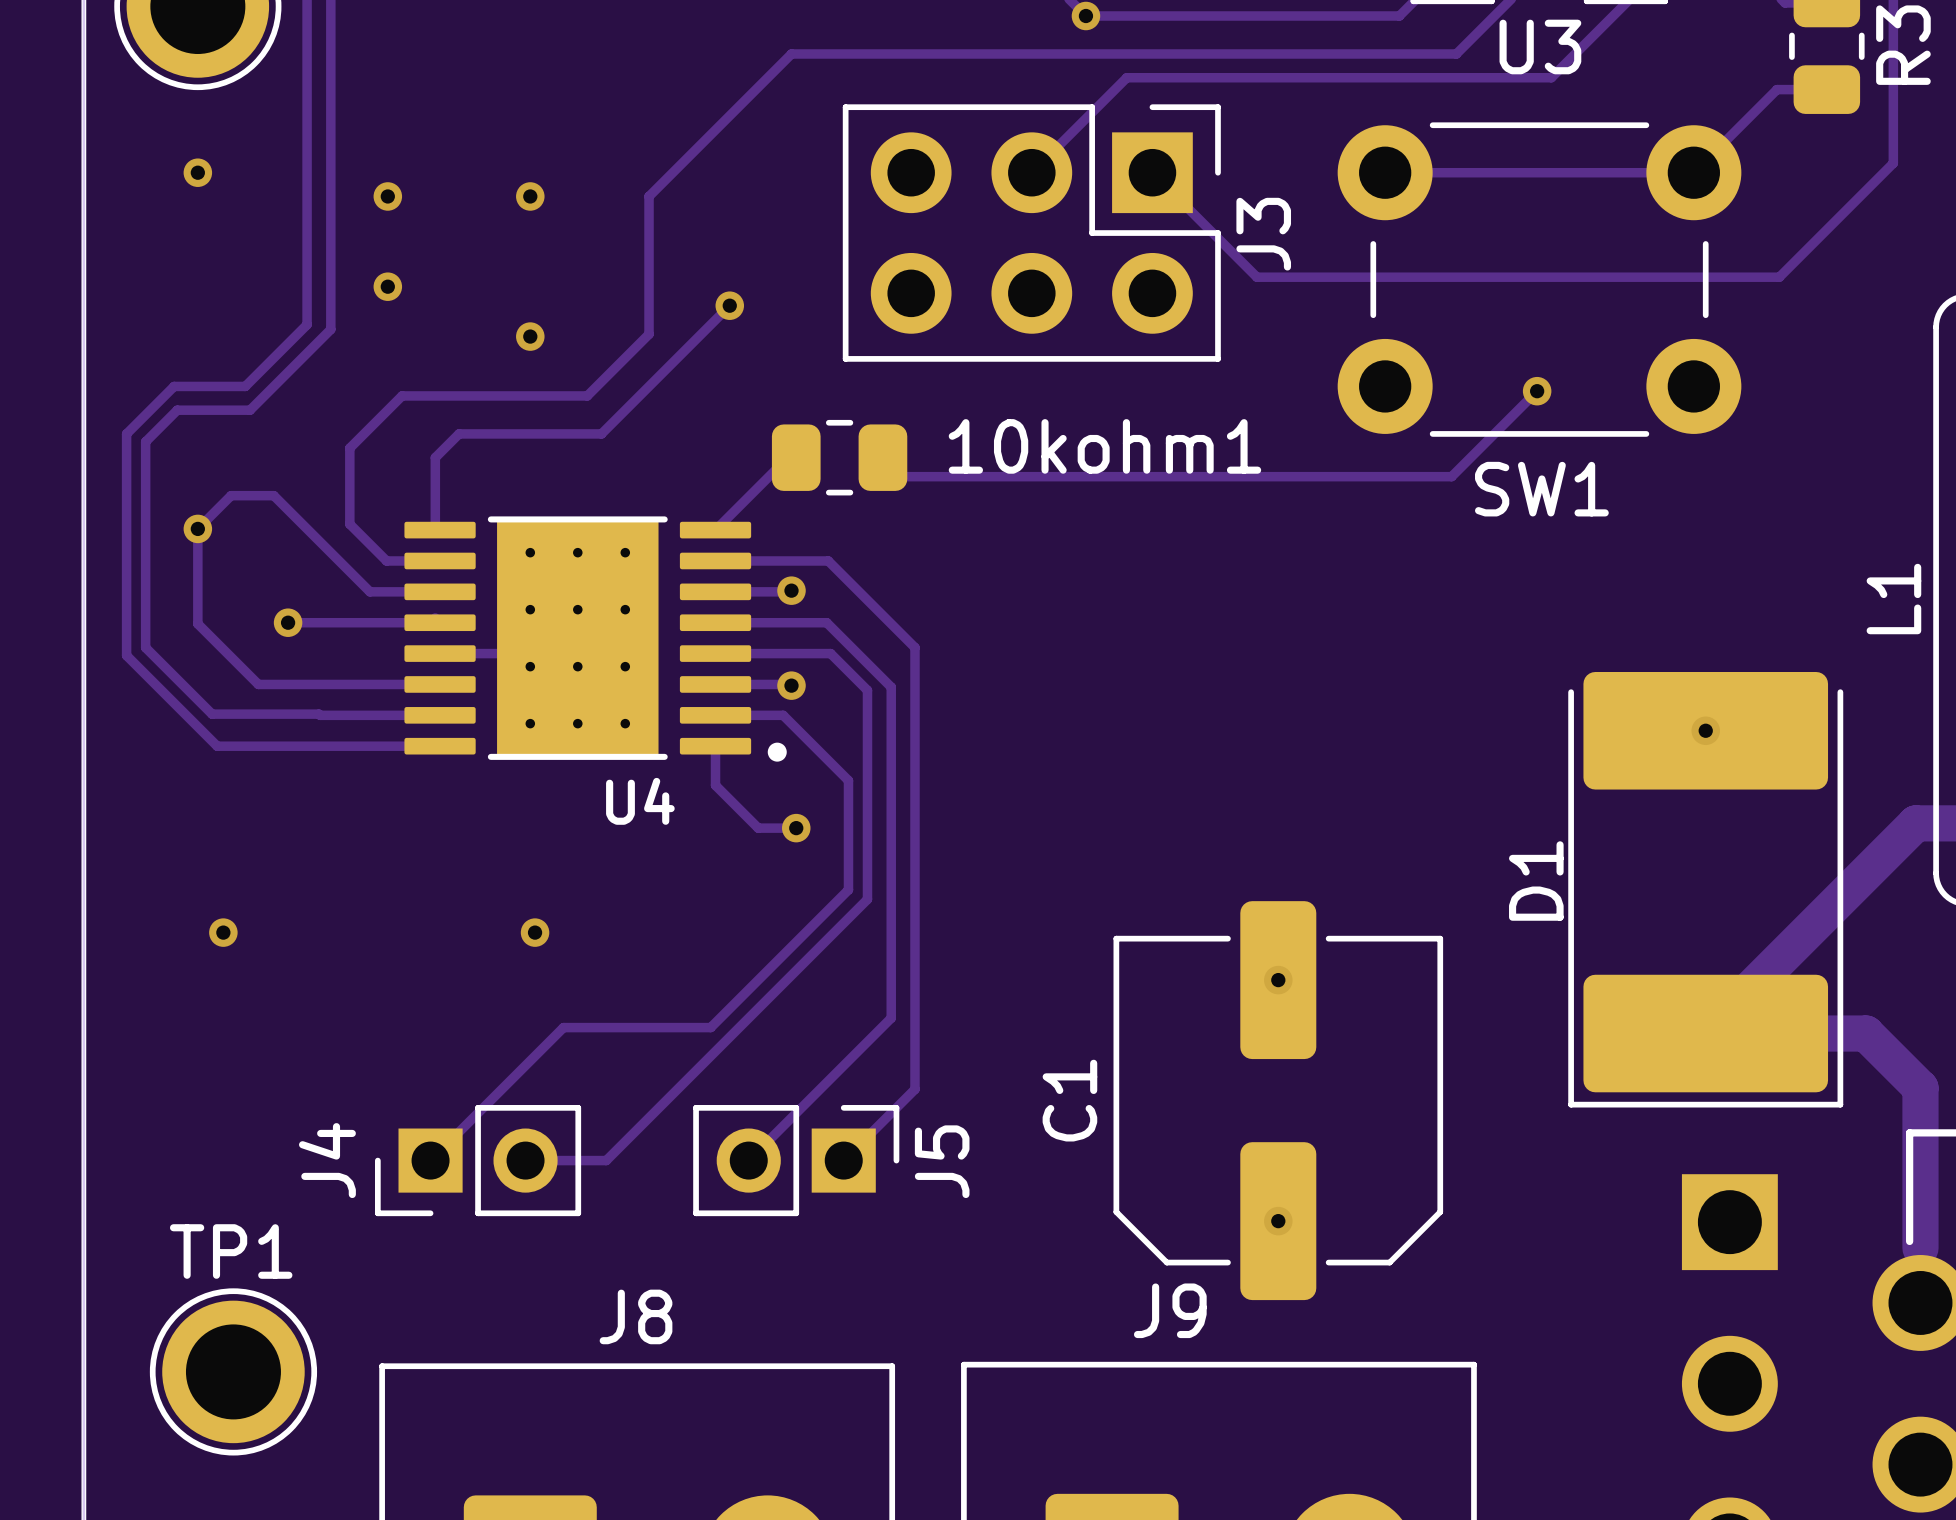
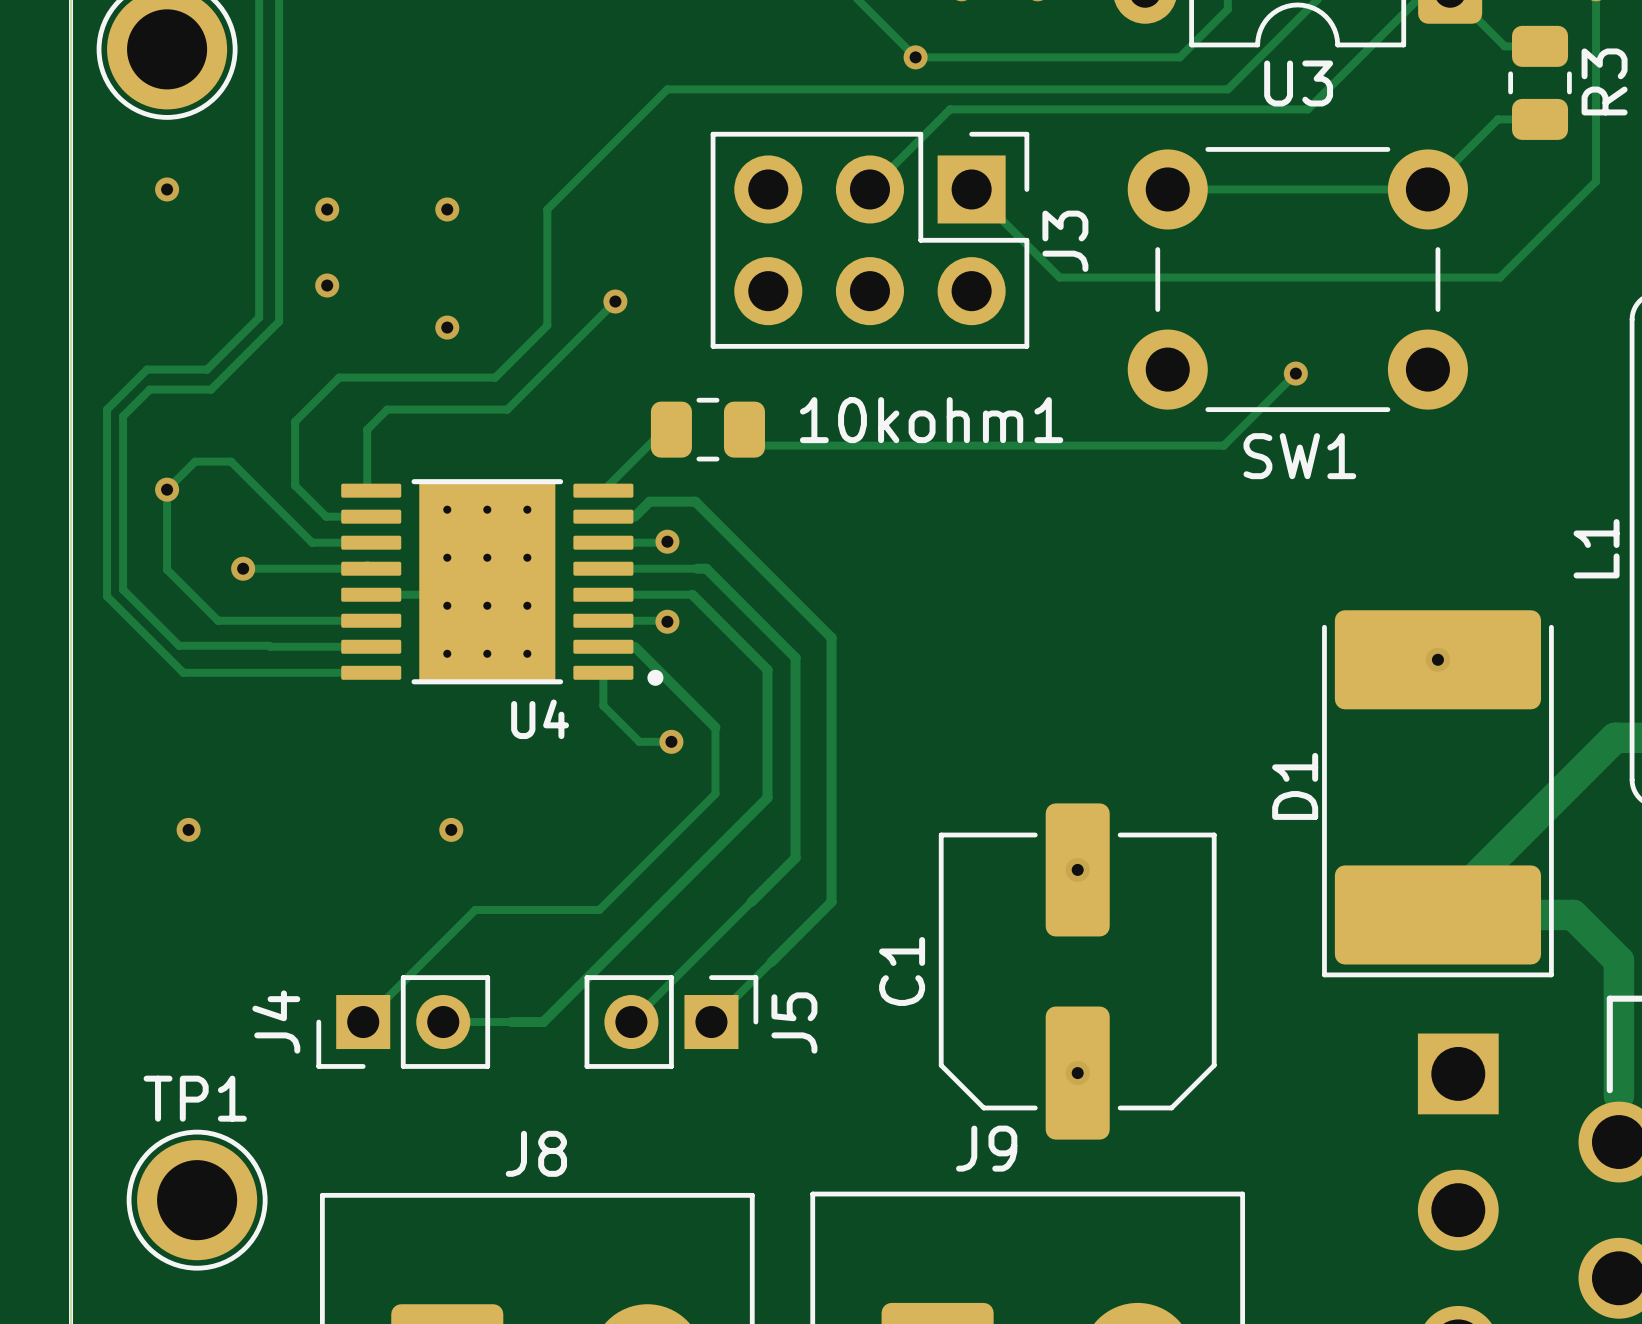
track: (752, 560) (828, 560) (914, 647) (914, 1089) -> (634, 516) (649, 501) (695, 501) (831, 637) (831, 901) (771, 961)
track: (826, 622) (891, 687) (891, 1018) -> (697, 568) (706, 568) (795, 657) (795, 857) (751, 901)
track: (821, 653) (830, 653) (867, 690) (867, 899) (606, 1160) -> (692, 594) (767, 669) (767, 797) (543, 1022) (511, 1022)
track: (752, 715) (783, 715) (848, 780) (848, 811) -> (634, 646) (715, 727)

